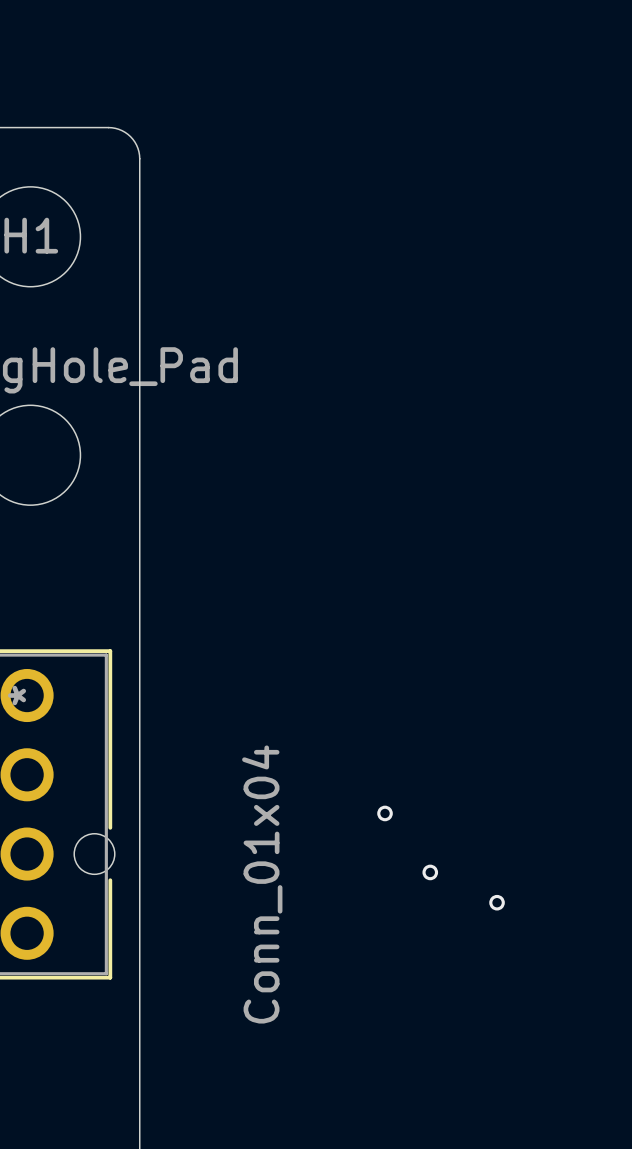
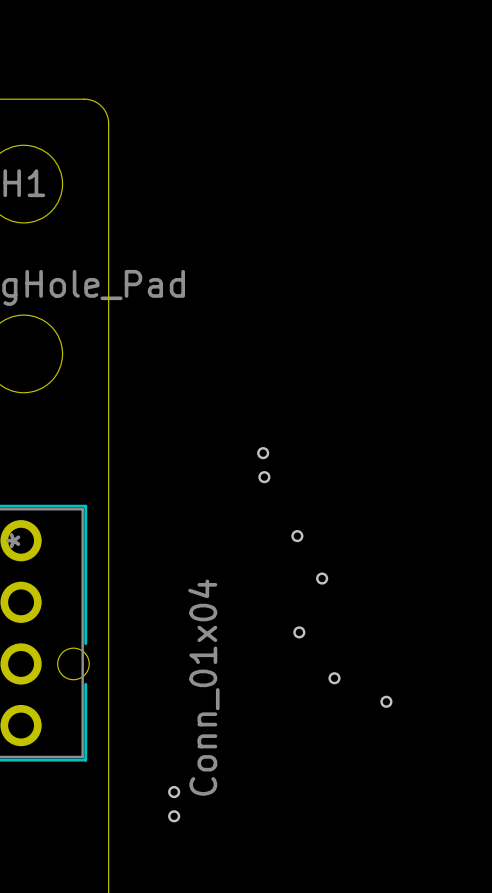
via: none -> (263, 453)
via: none -> (264, 477)
via: none -> (297, 536)
via: none -> (322, 578)
via: none -> (174, 792)
via: none -> (174, 816)

